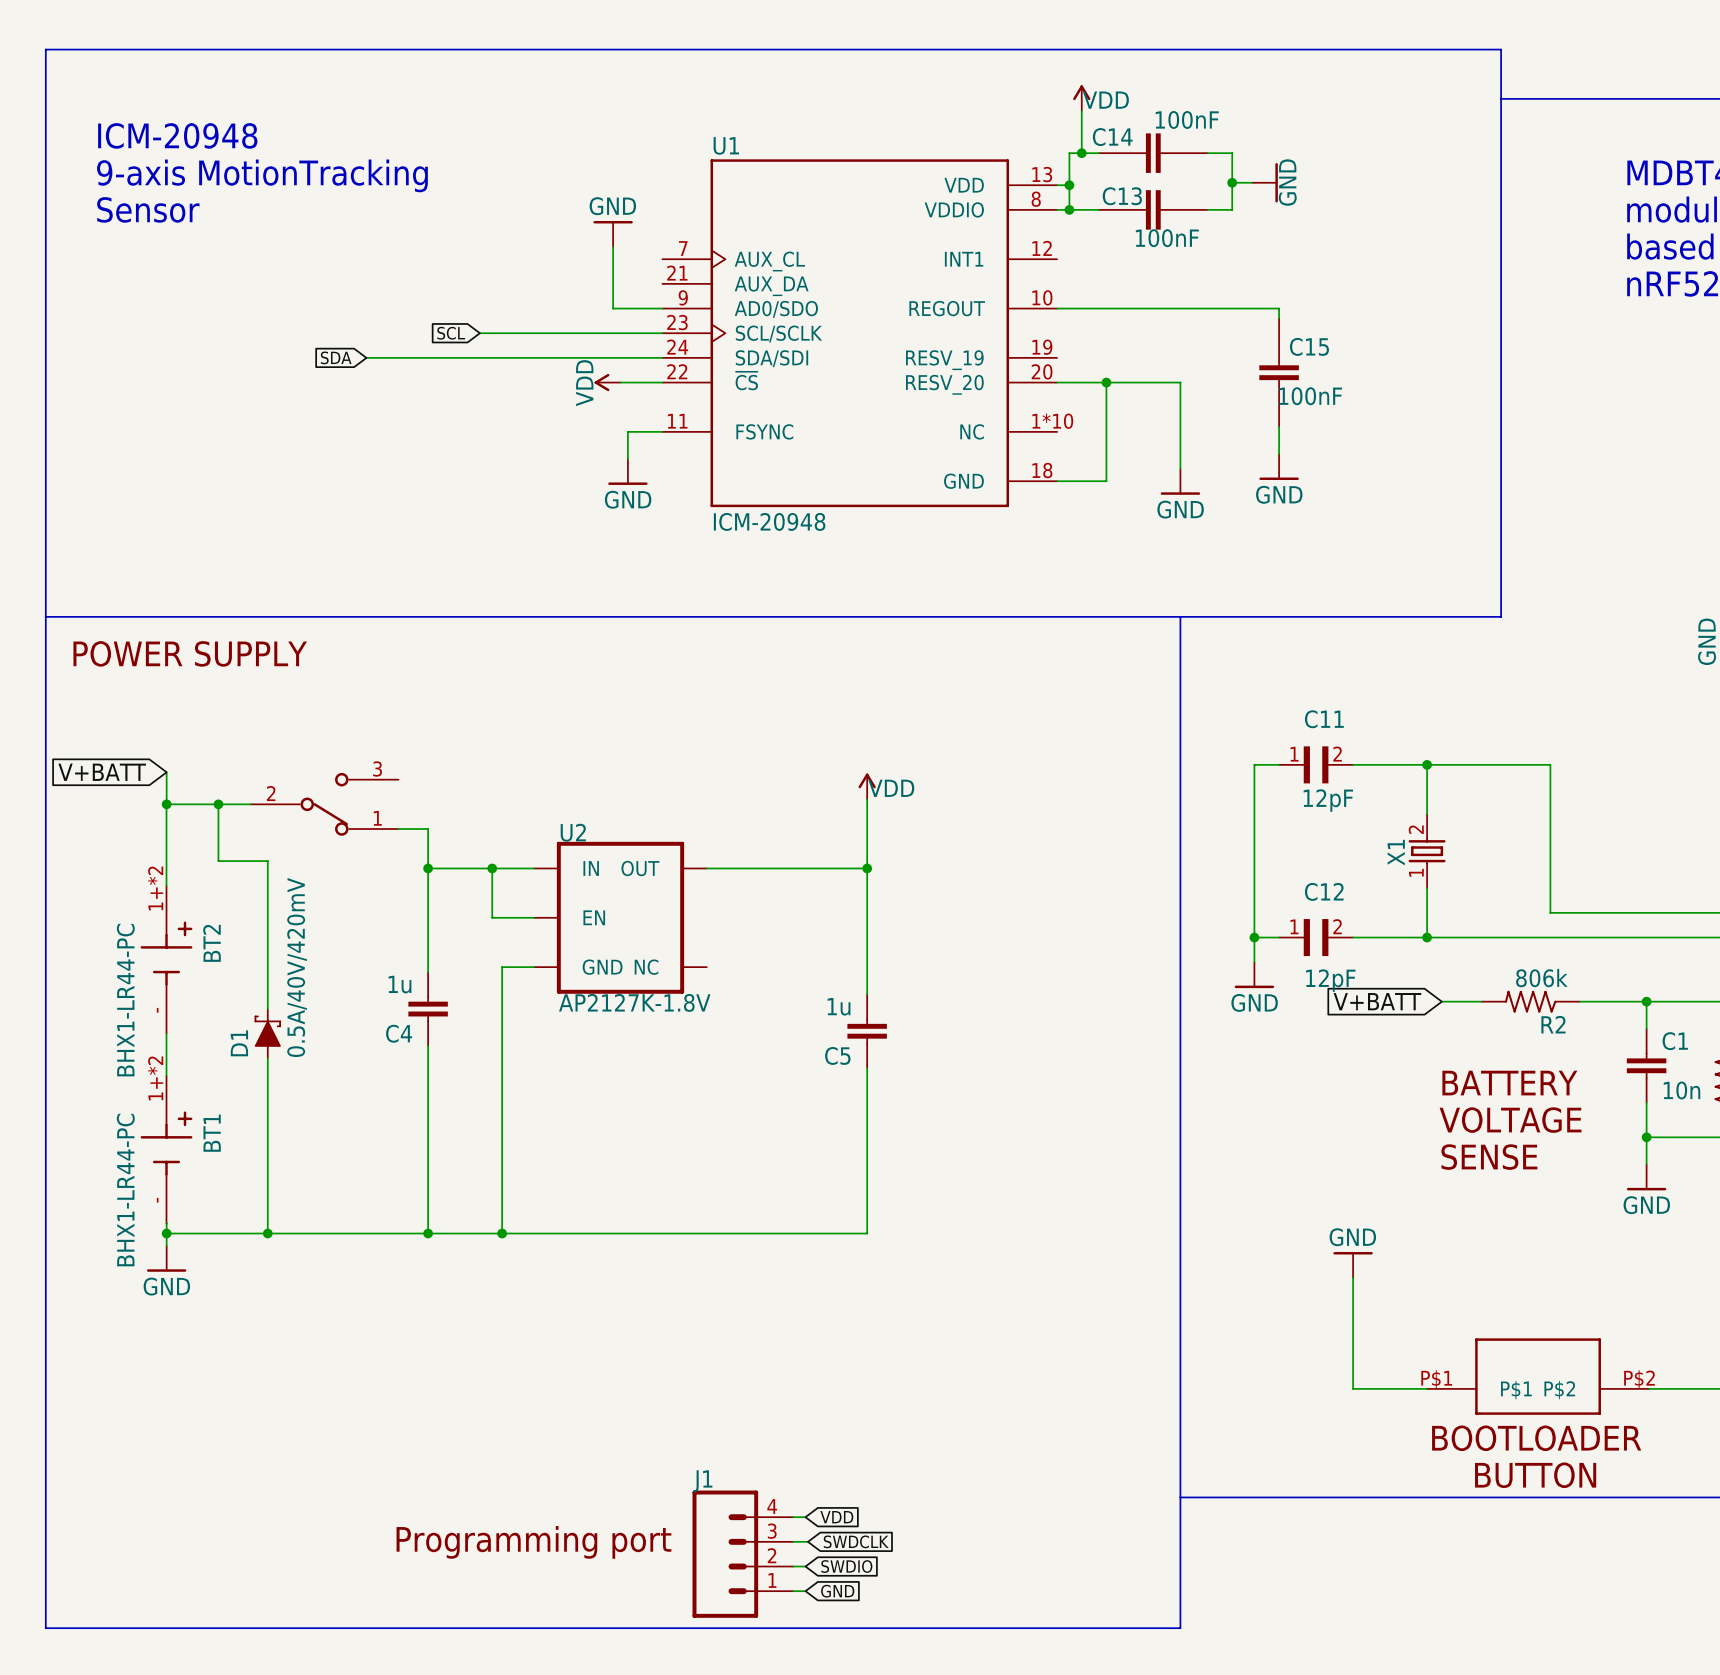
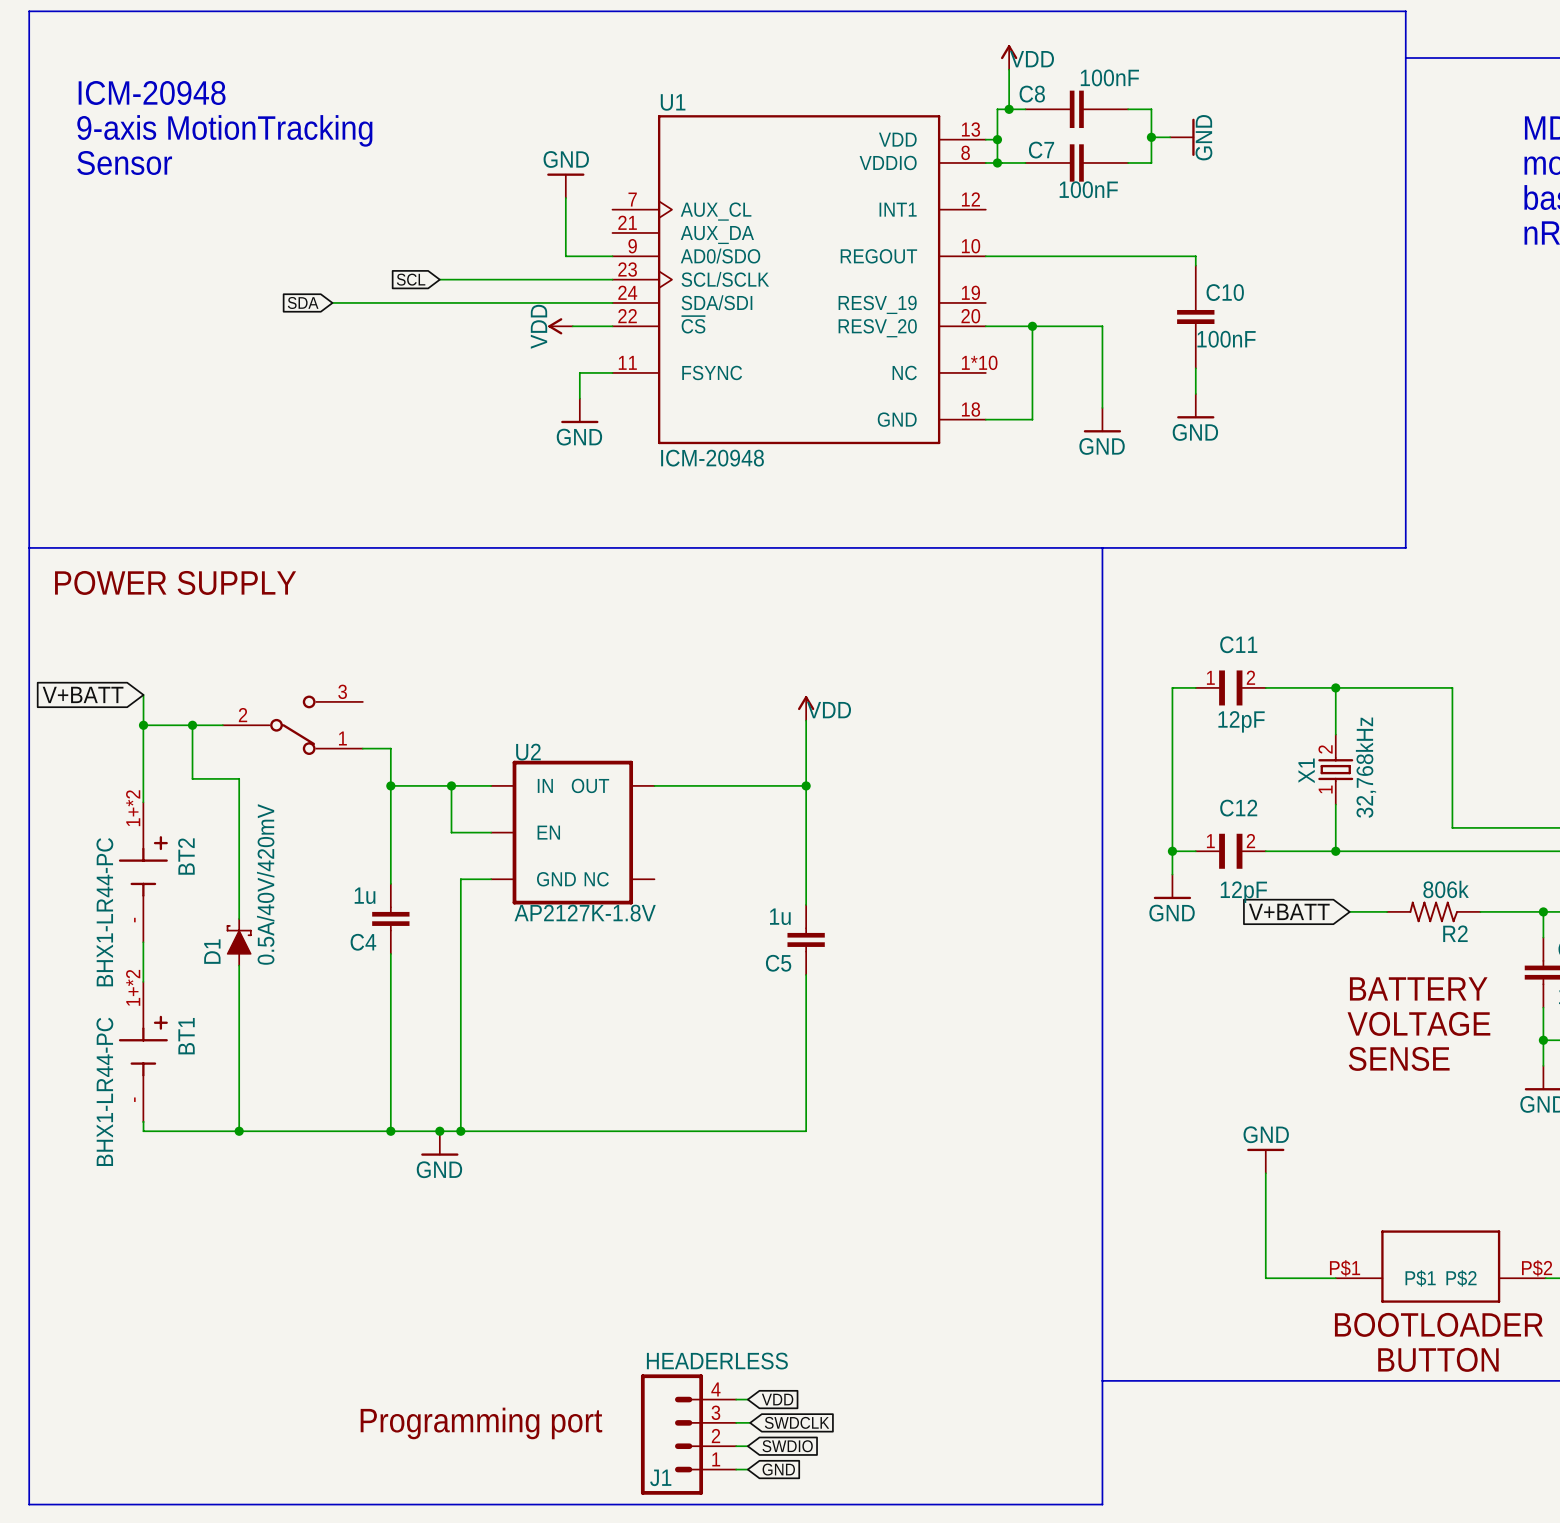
C14 name: C14 (1112, 137) -> C8 (1032, 94)
C13 name: C13 (1122, 196) -> C7 (1041, 150)
C15 name: C15 (1309, 346) -> C10 (1225, 292)
X1 value: none -> 32,768kHz (1366, 767)
wire: (166, 1233) (166, 1245) -> none
junction: (166, 1233) -> none
junction: none -> (439, 1131)
power symbol: none -> GND (439, 1143)
power symbol: GND (166, 1258) -> none
J1 value: none -> HEADERLESS (717, 1361)
J1 name position: J1 (702, 1481) -> J1 (660, 1477)

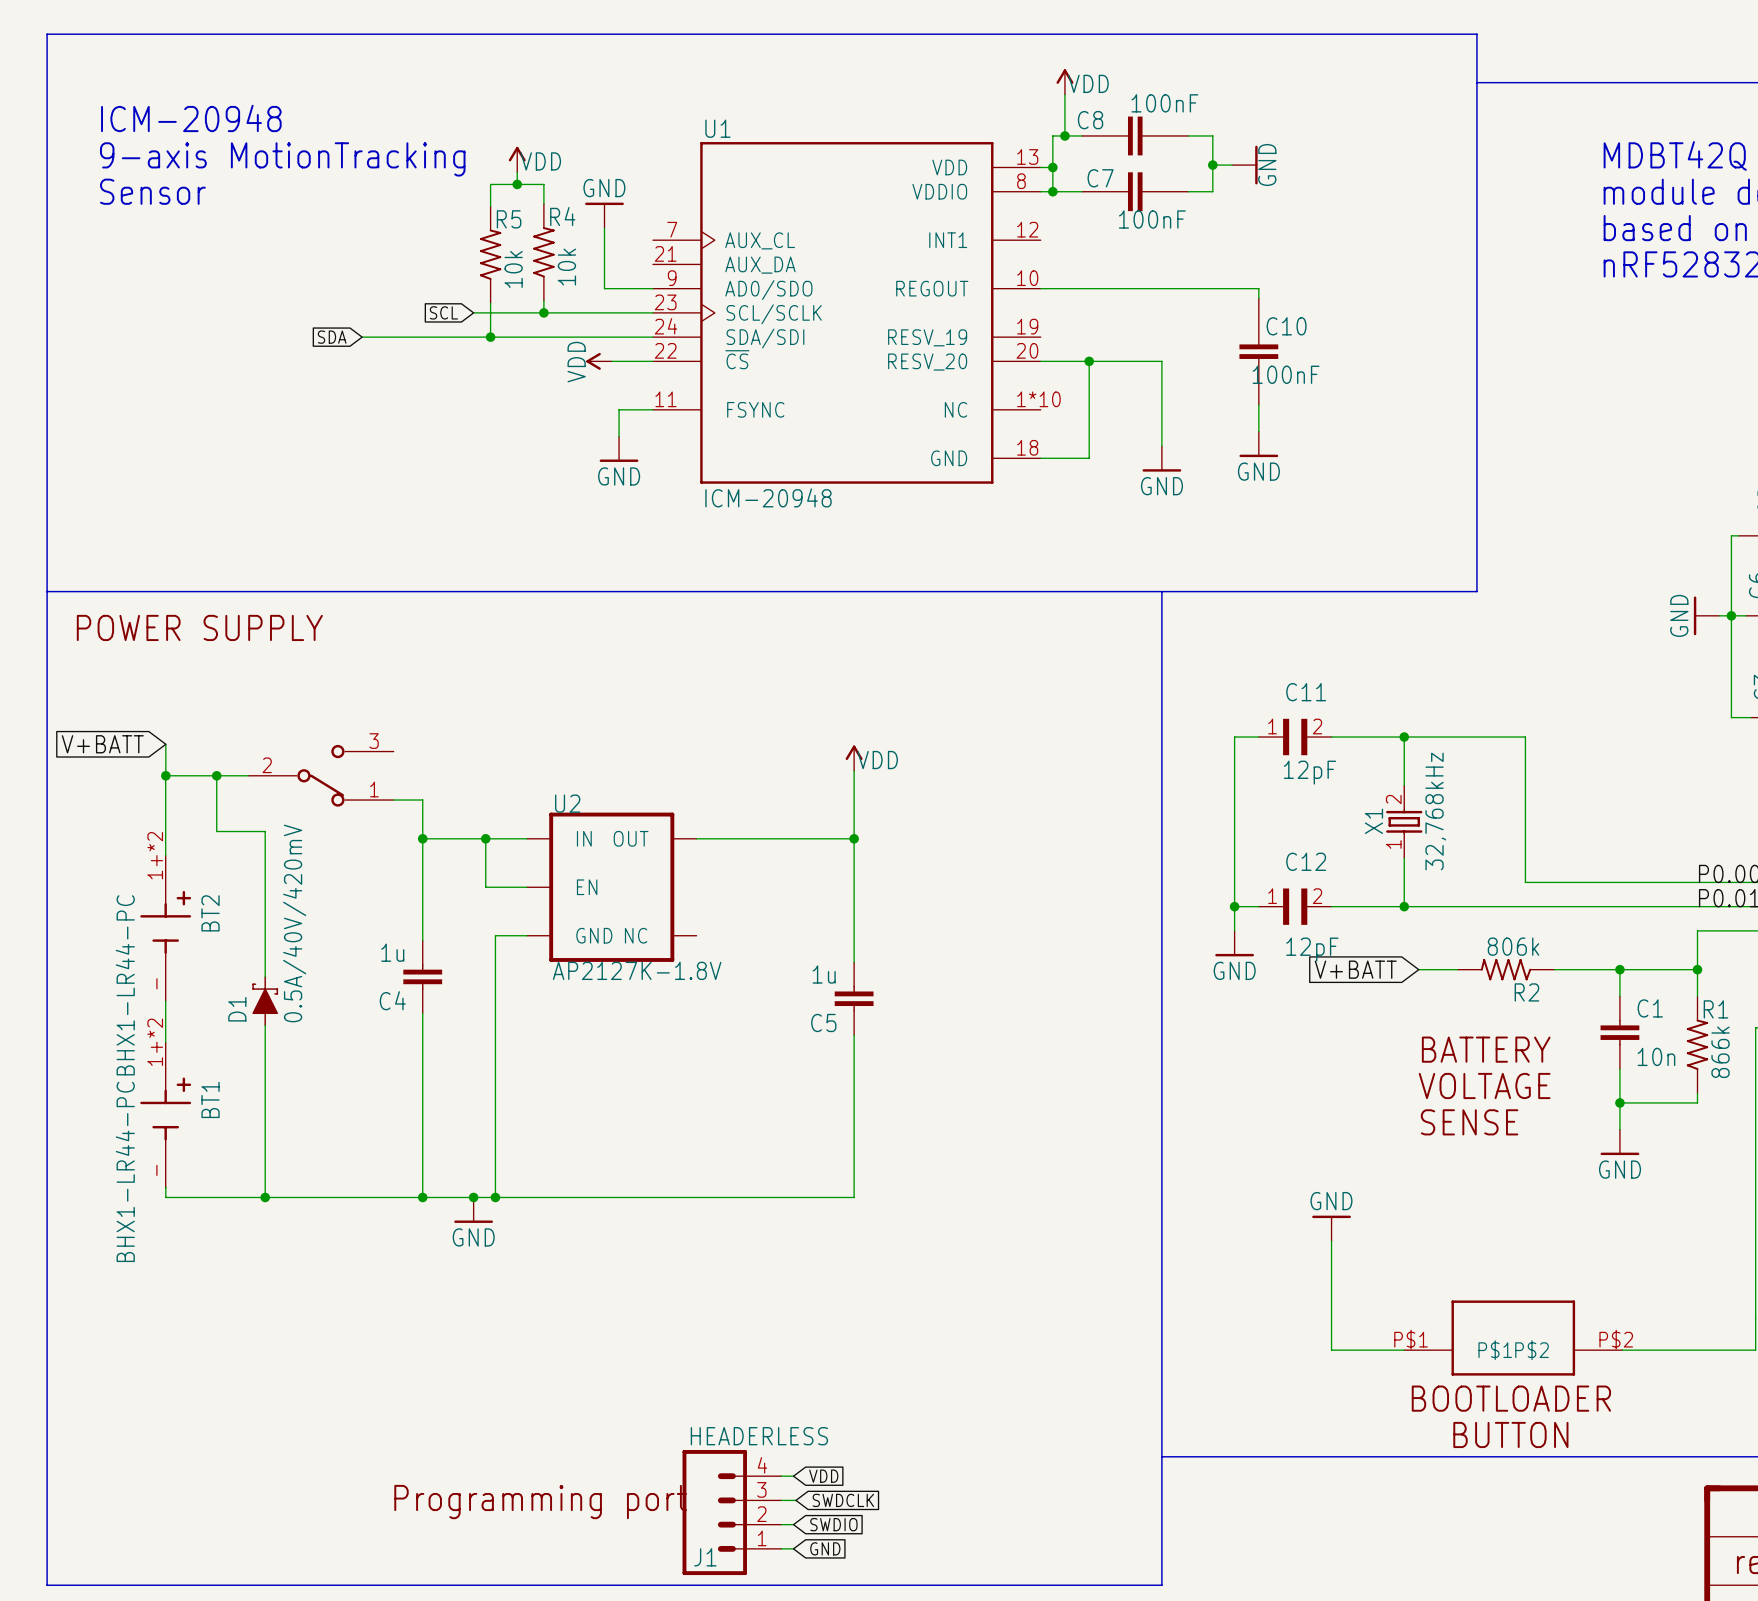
power symbol: none -> VDD (517, 159)
wire: none -> (517, 172) (517, 184)
junction: none -> (517, 184)
wire: none -> (543, 203) (543, 184) (490, 184) (490, 206)
R4: none -> 10k (543, 252)
R5: none -> 10k (490, 254)
wire: none -> (543, 300) (543, 312)
wire: none -> (490, 303) (490, 337)
junction: none -> (543, 312)
junction: none -> (490, 337)

